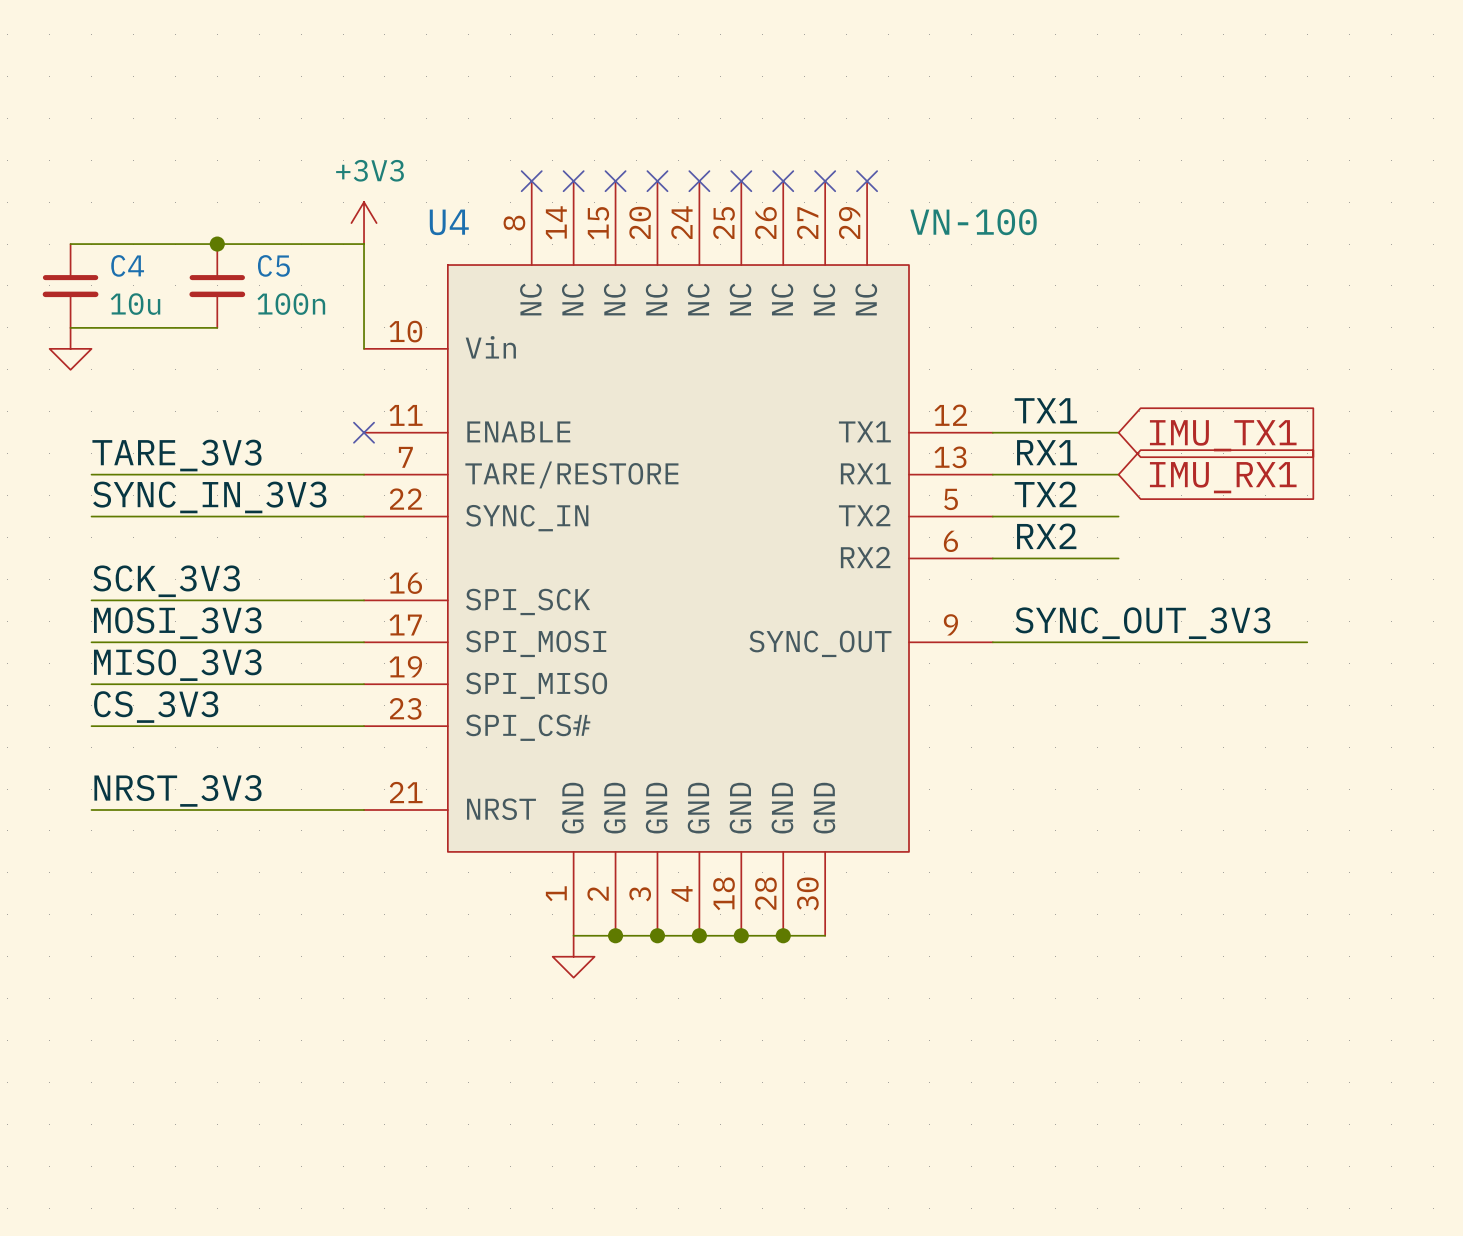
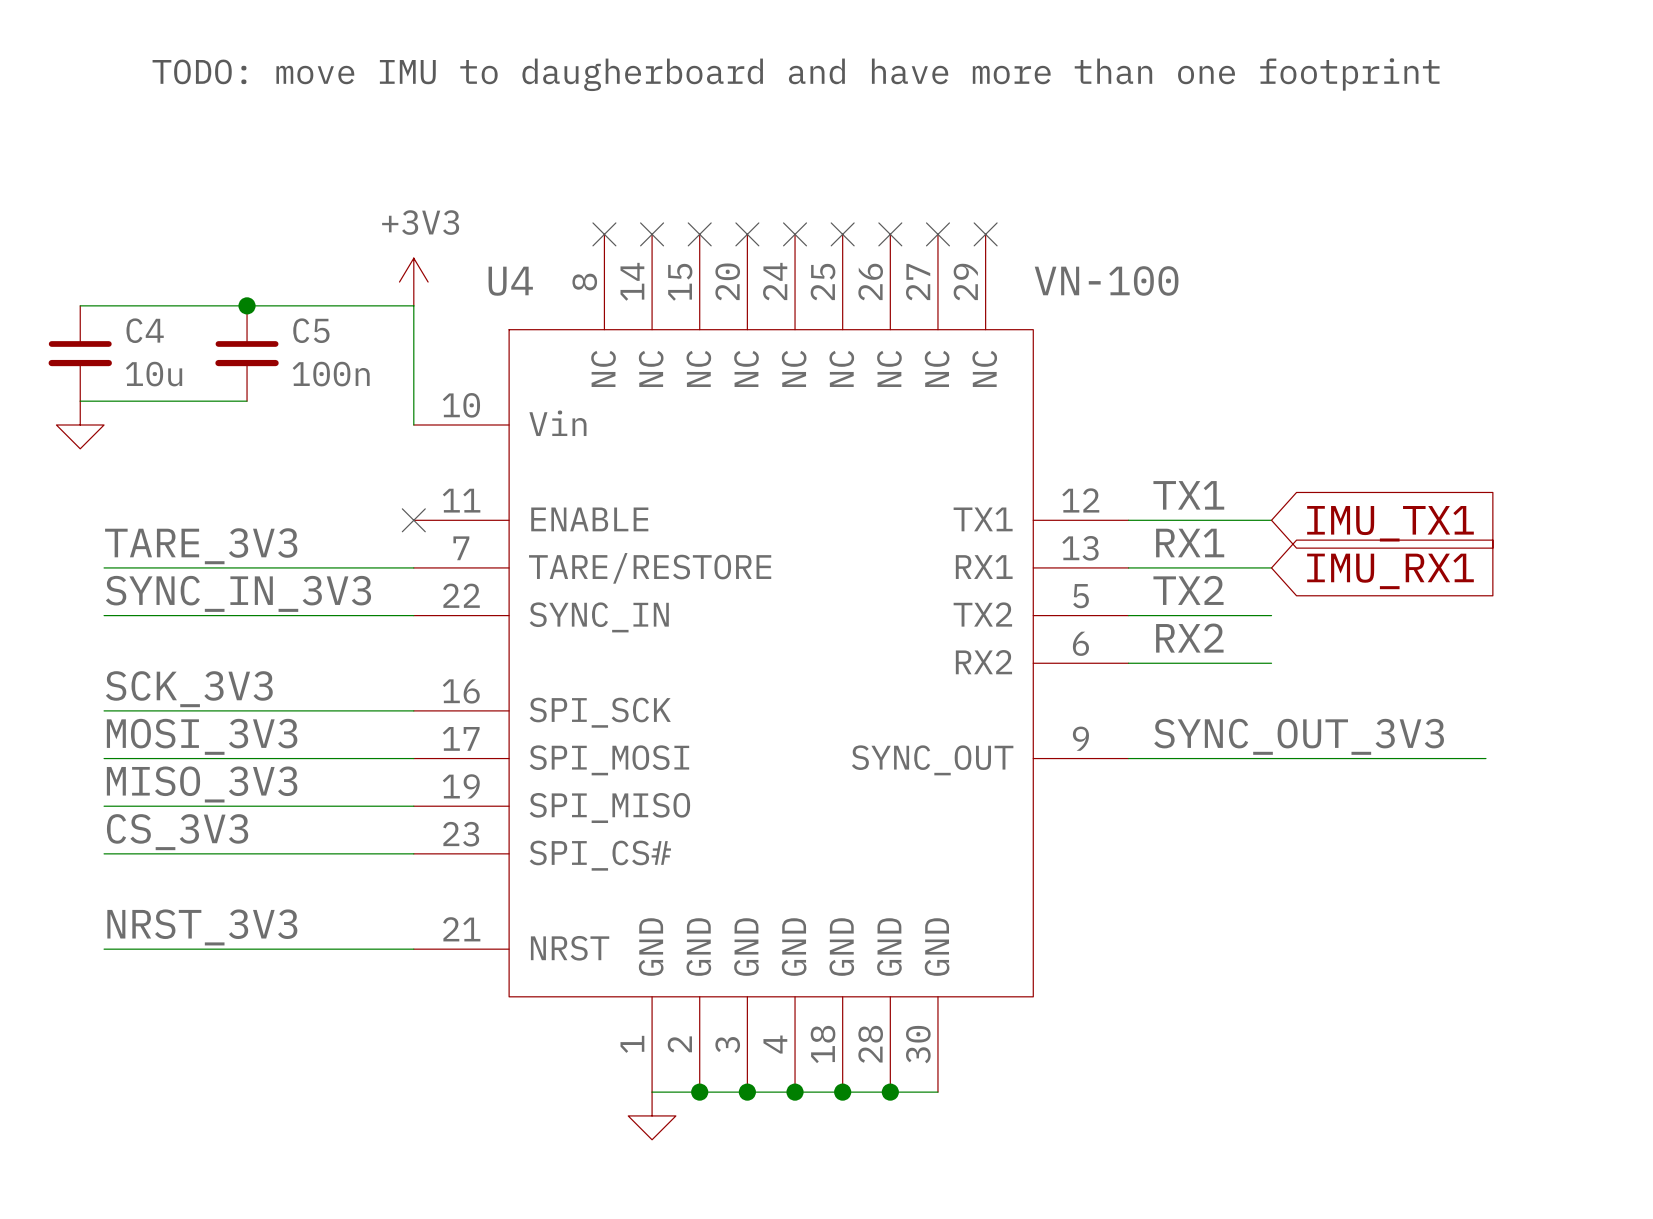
text: none -> TODO: move IMU to daugherboard and have more than one footprint (796, 74)

